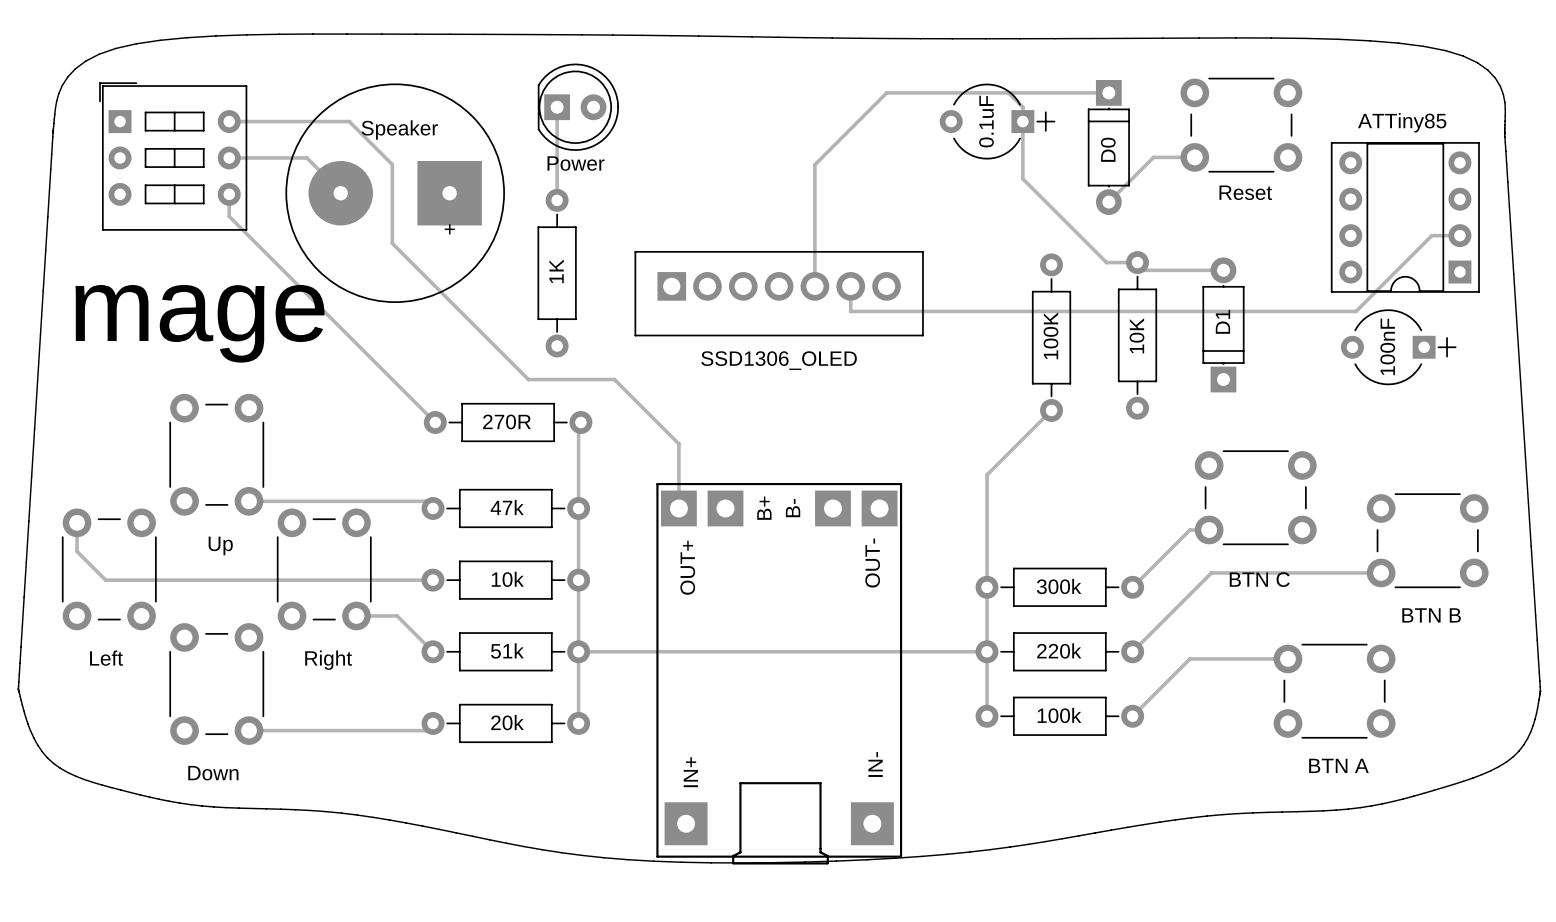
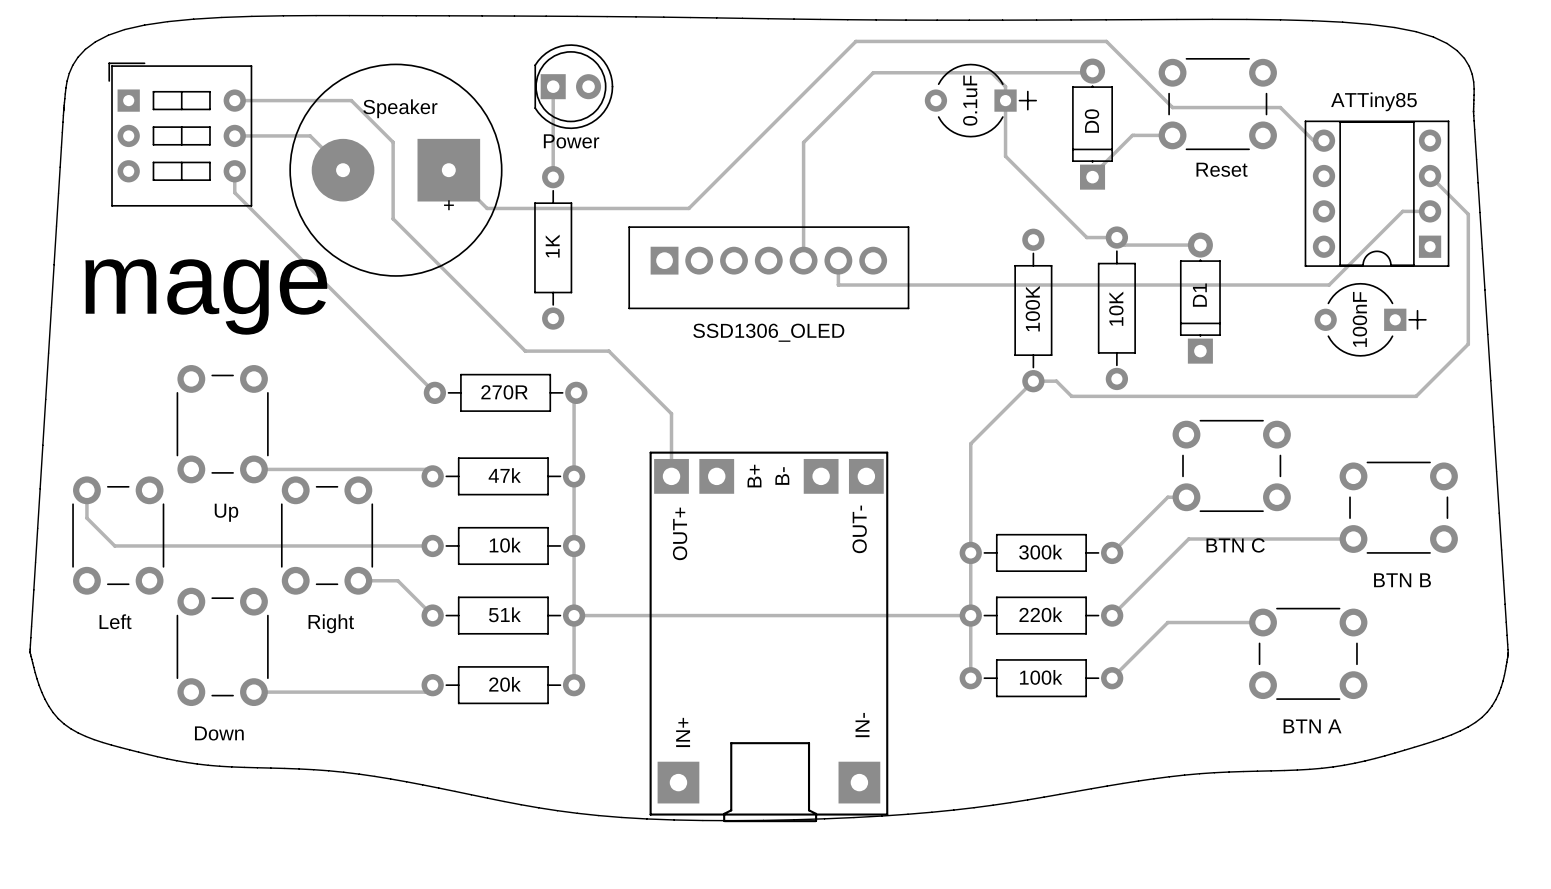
D0 rotation: 0° (1108, 147) -> 180° (1092, 124)
track: none -> (1323, 140) (1313, 140) (1280, 107) (1172, 107) (1106, 41) (855, 41) (688, 208) (487, 208) (448, 170)
track: none -> (1430, 176) (1468, 214) (1468, 344) (1416, 396) (1071, 396) (1056, 381) (1033, 381)

